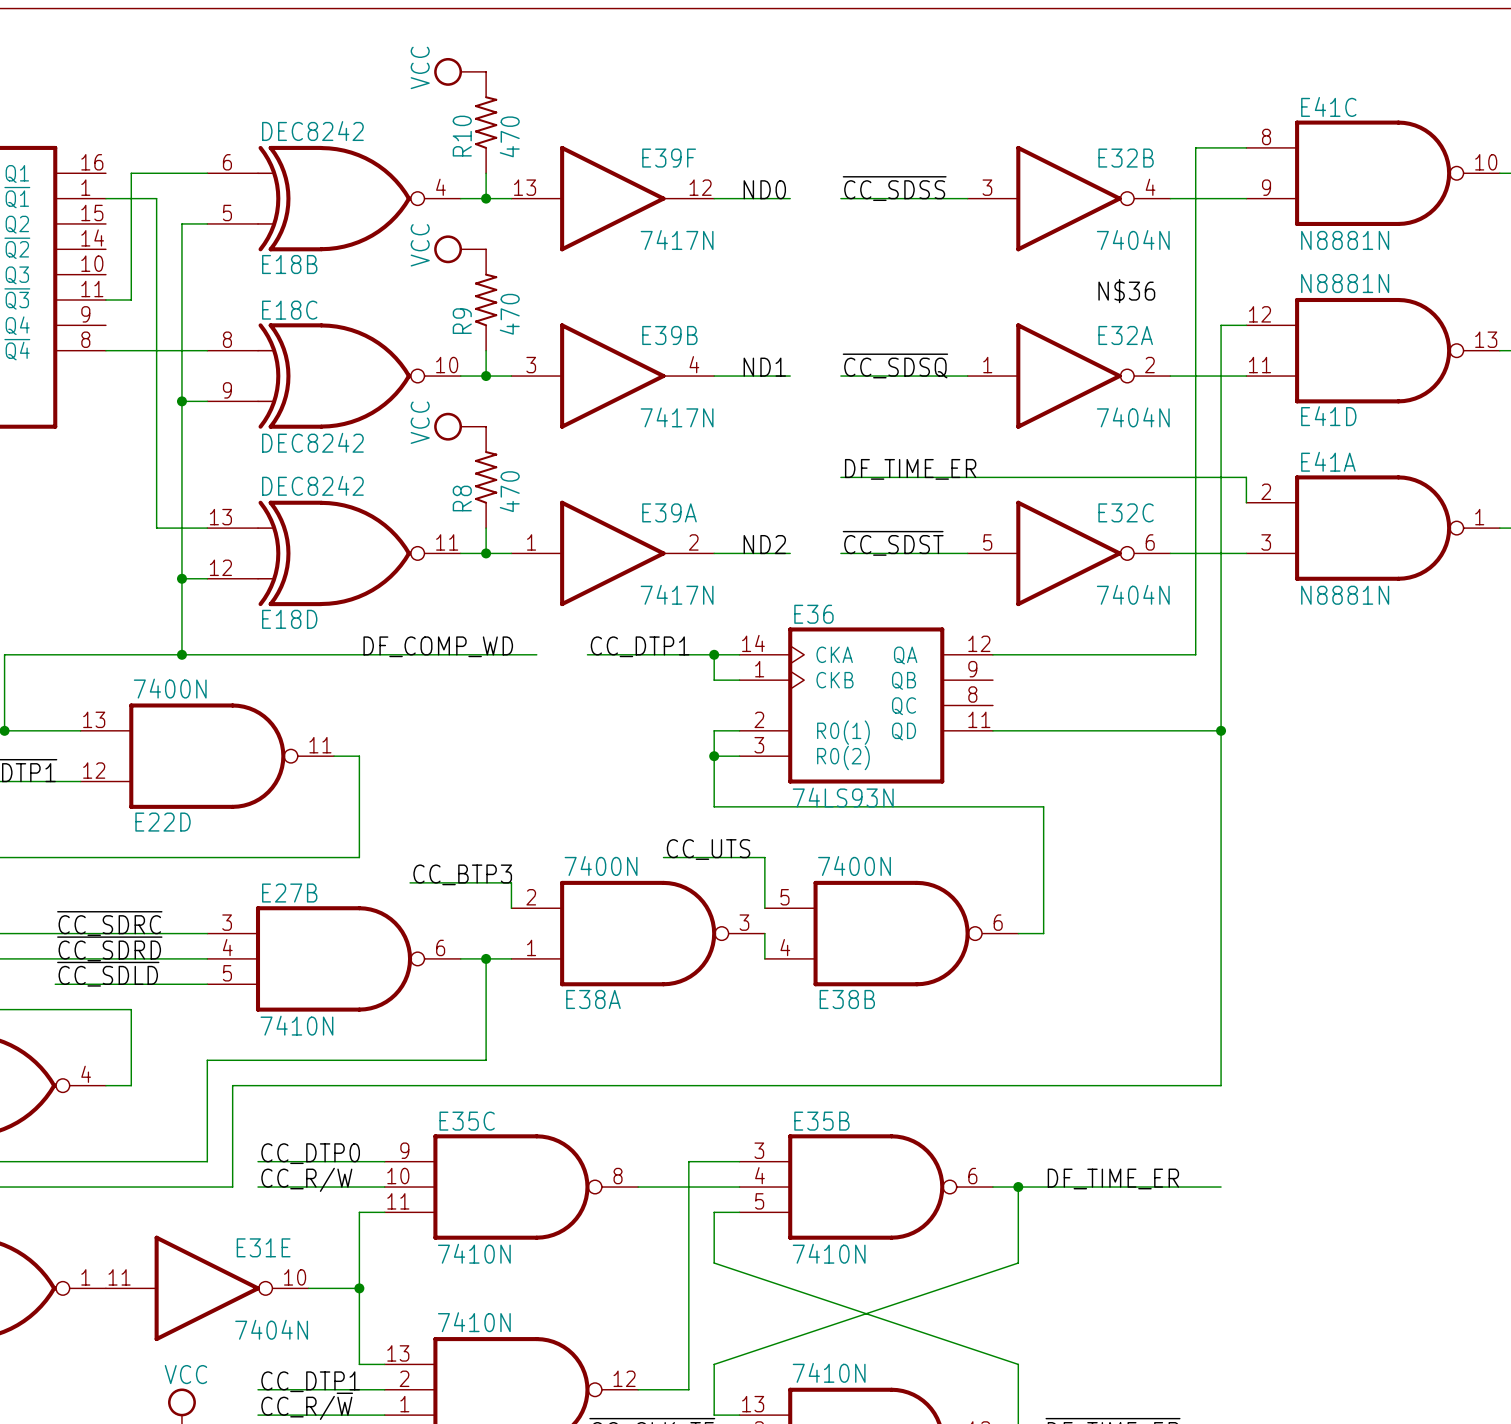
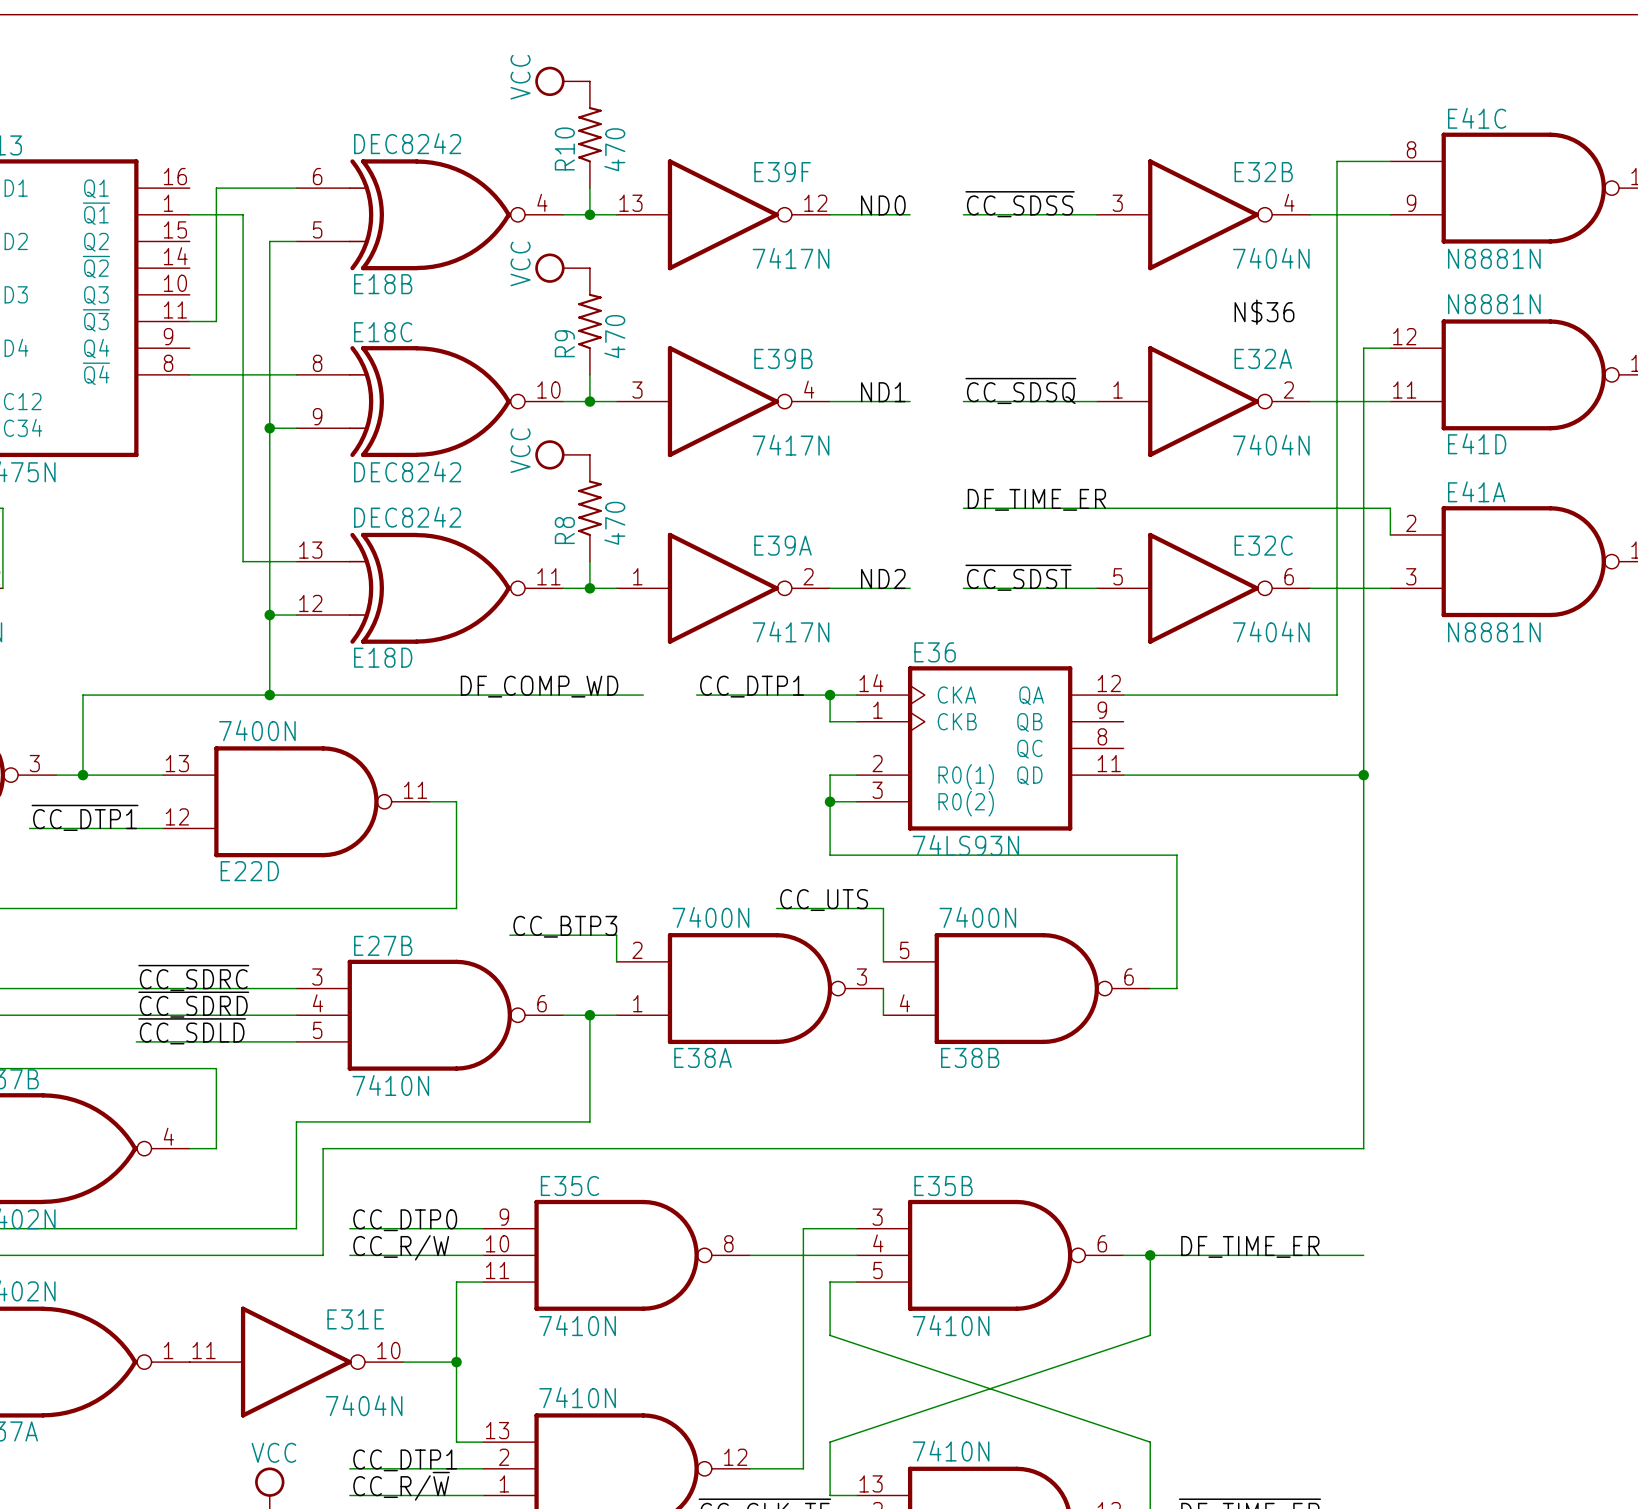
E39F symbol: [511, 145, 715, 252] -> [616, 159, 831, 271]
E39B symbol: [511, 323, 715, 429] -> [616, 346, 831, 458]
E39A symbol: [511, 500, 715, 607] -> [616, 532, 831, 644]

